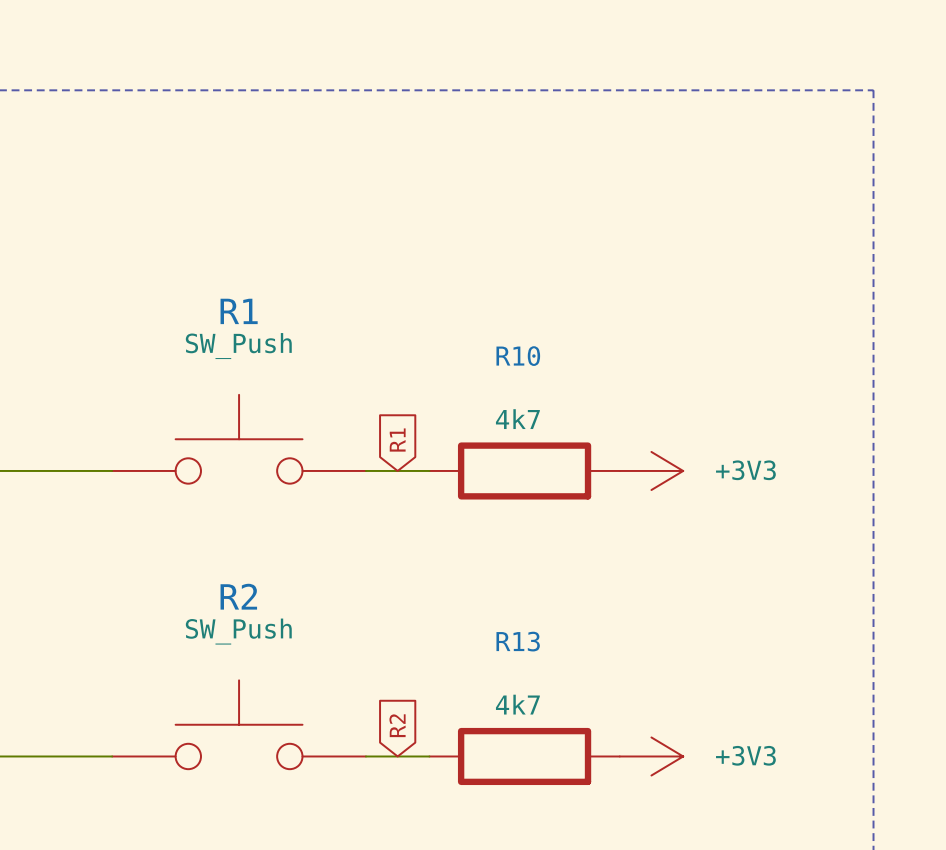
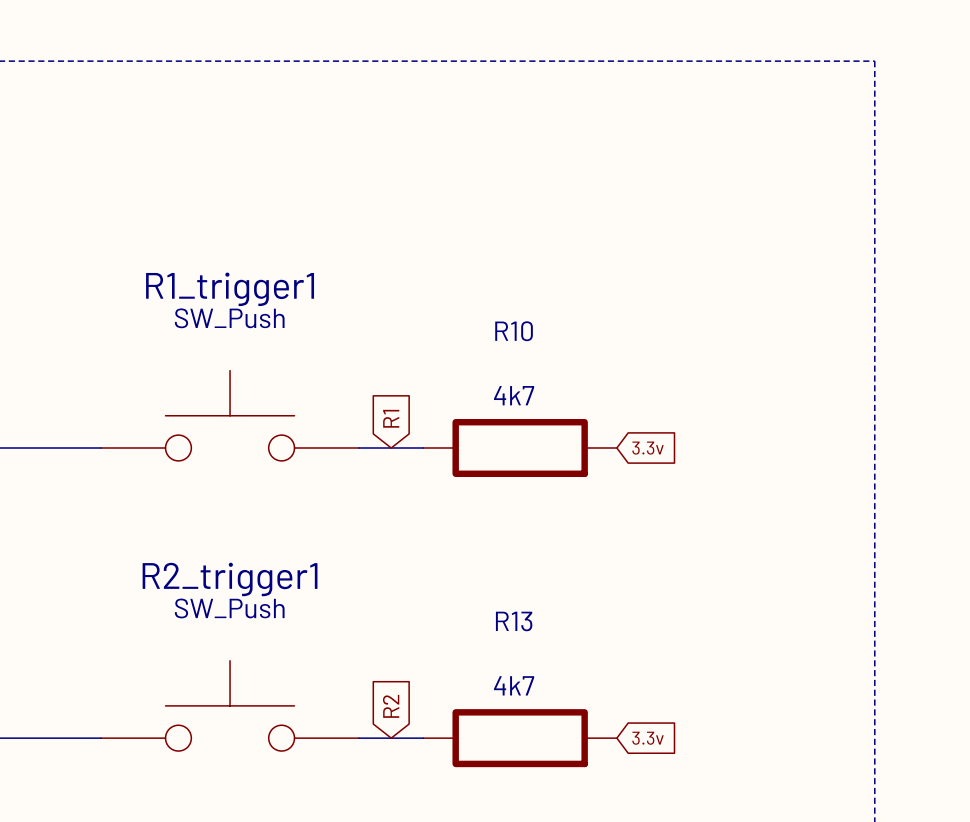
R1 name: R1 (239, 311) -> R1_trigger1 (230, 289)
power symbol: +3V3 (651, 470) -> none
global label: none -> 3.3v (648, 448)
R2 name: R2 (238, 596) -> R2_trigger1 (230, 579)
power symbol: +3V3 (651, 756) -> none
global label: none -> 3.3v (648, 738)

